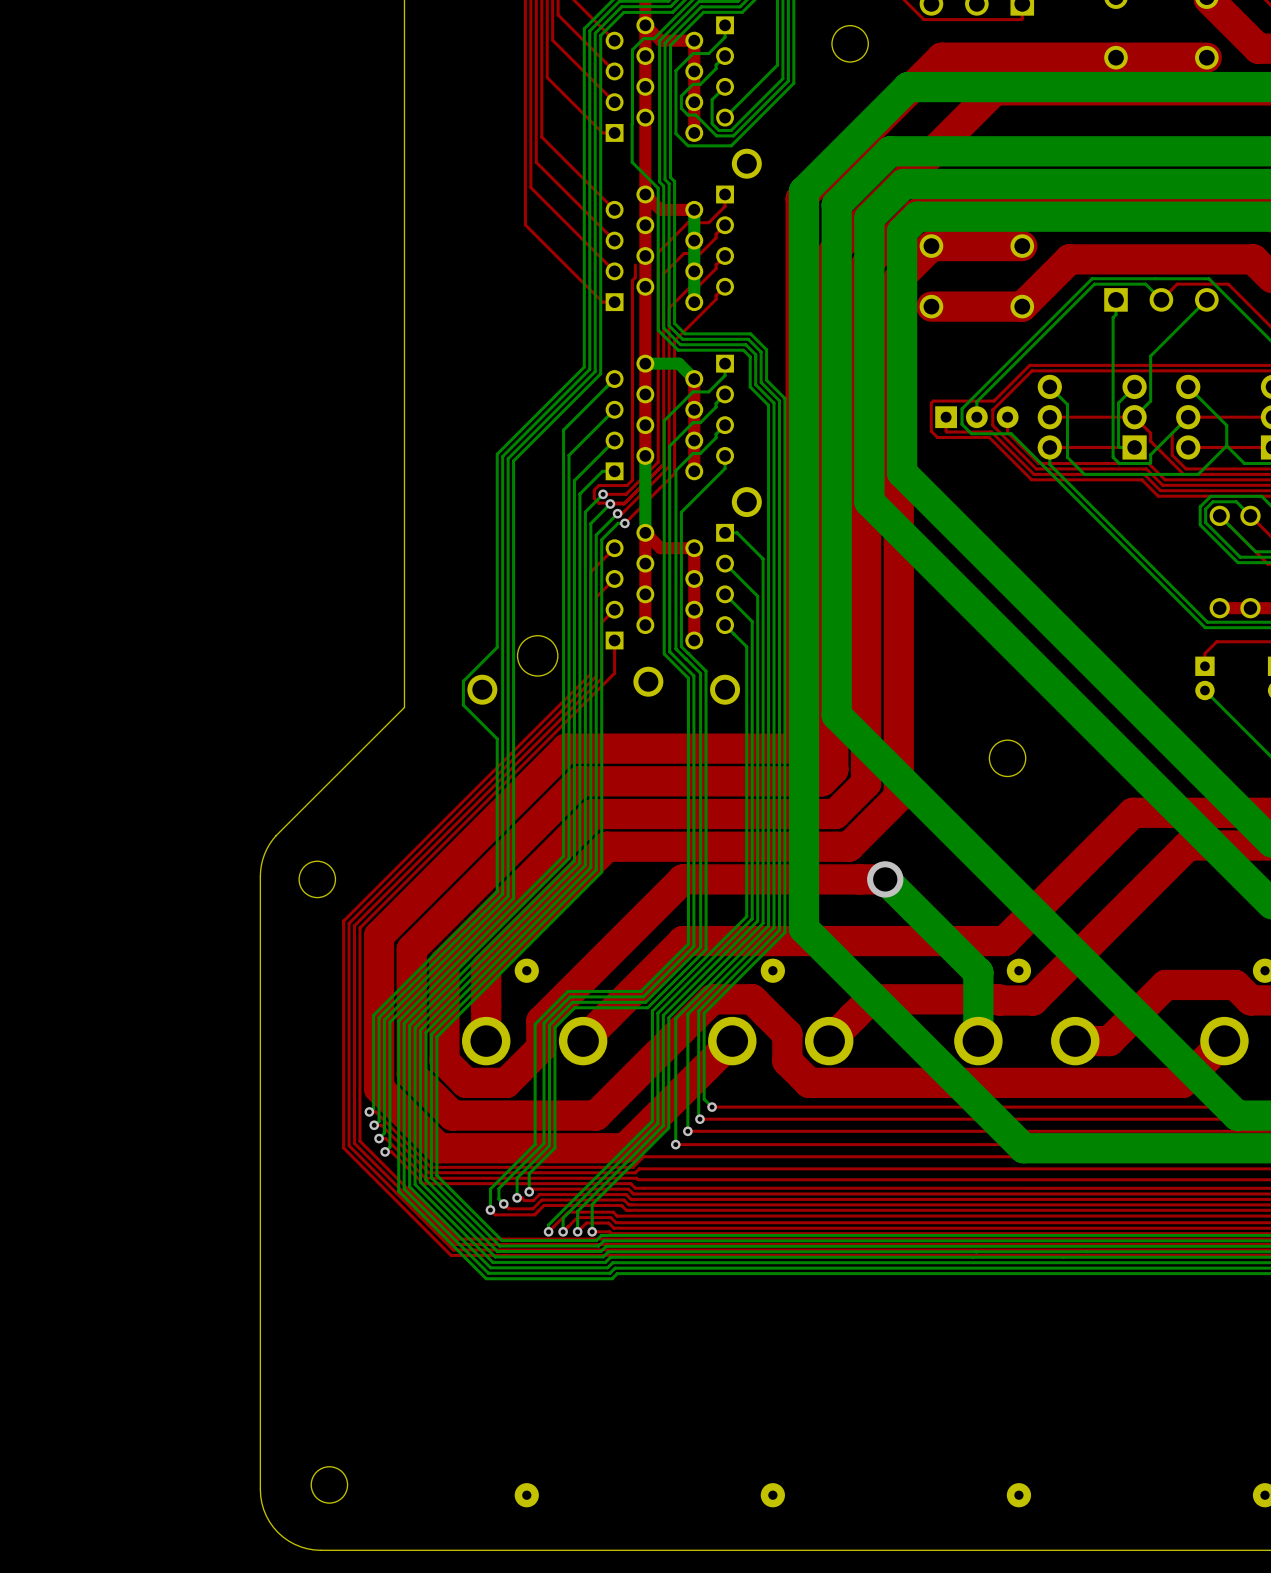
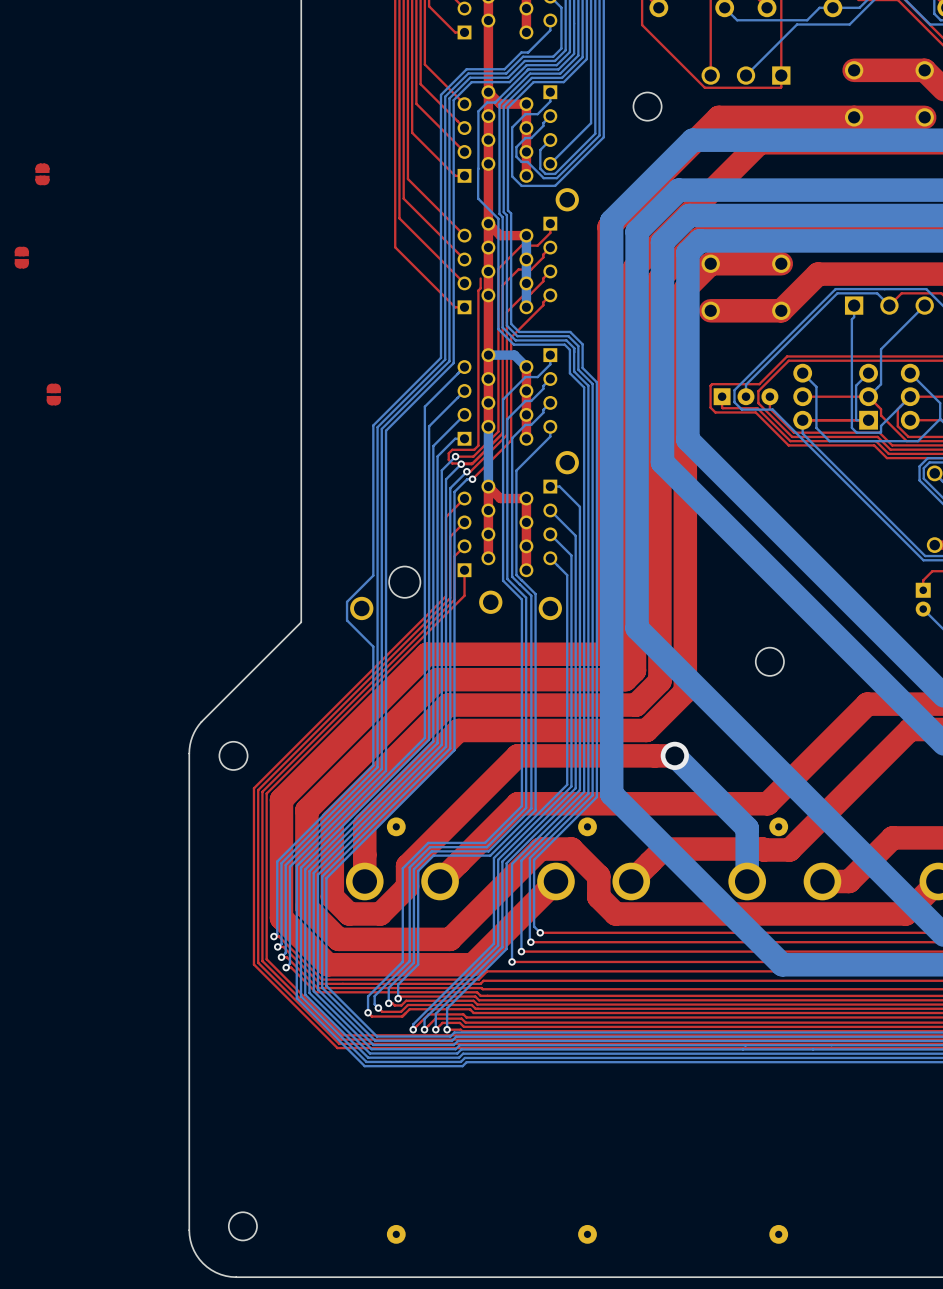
part: none -> (42, 174)
part: none -> (21, 257)
part: none -> (53, 394)

